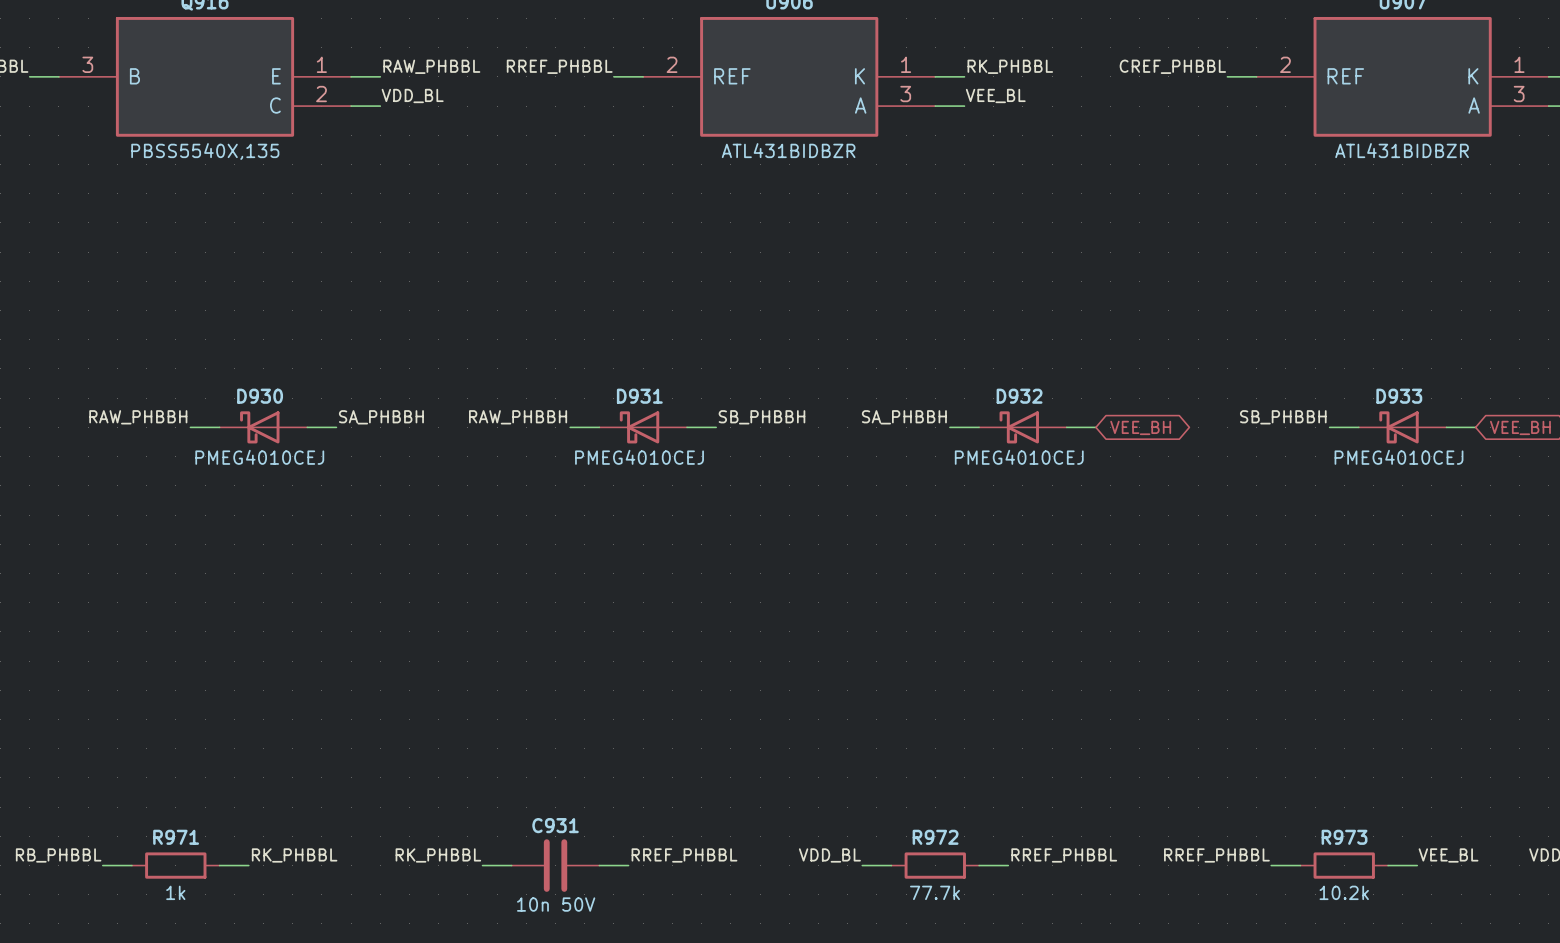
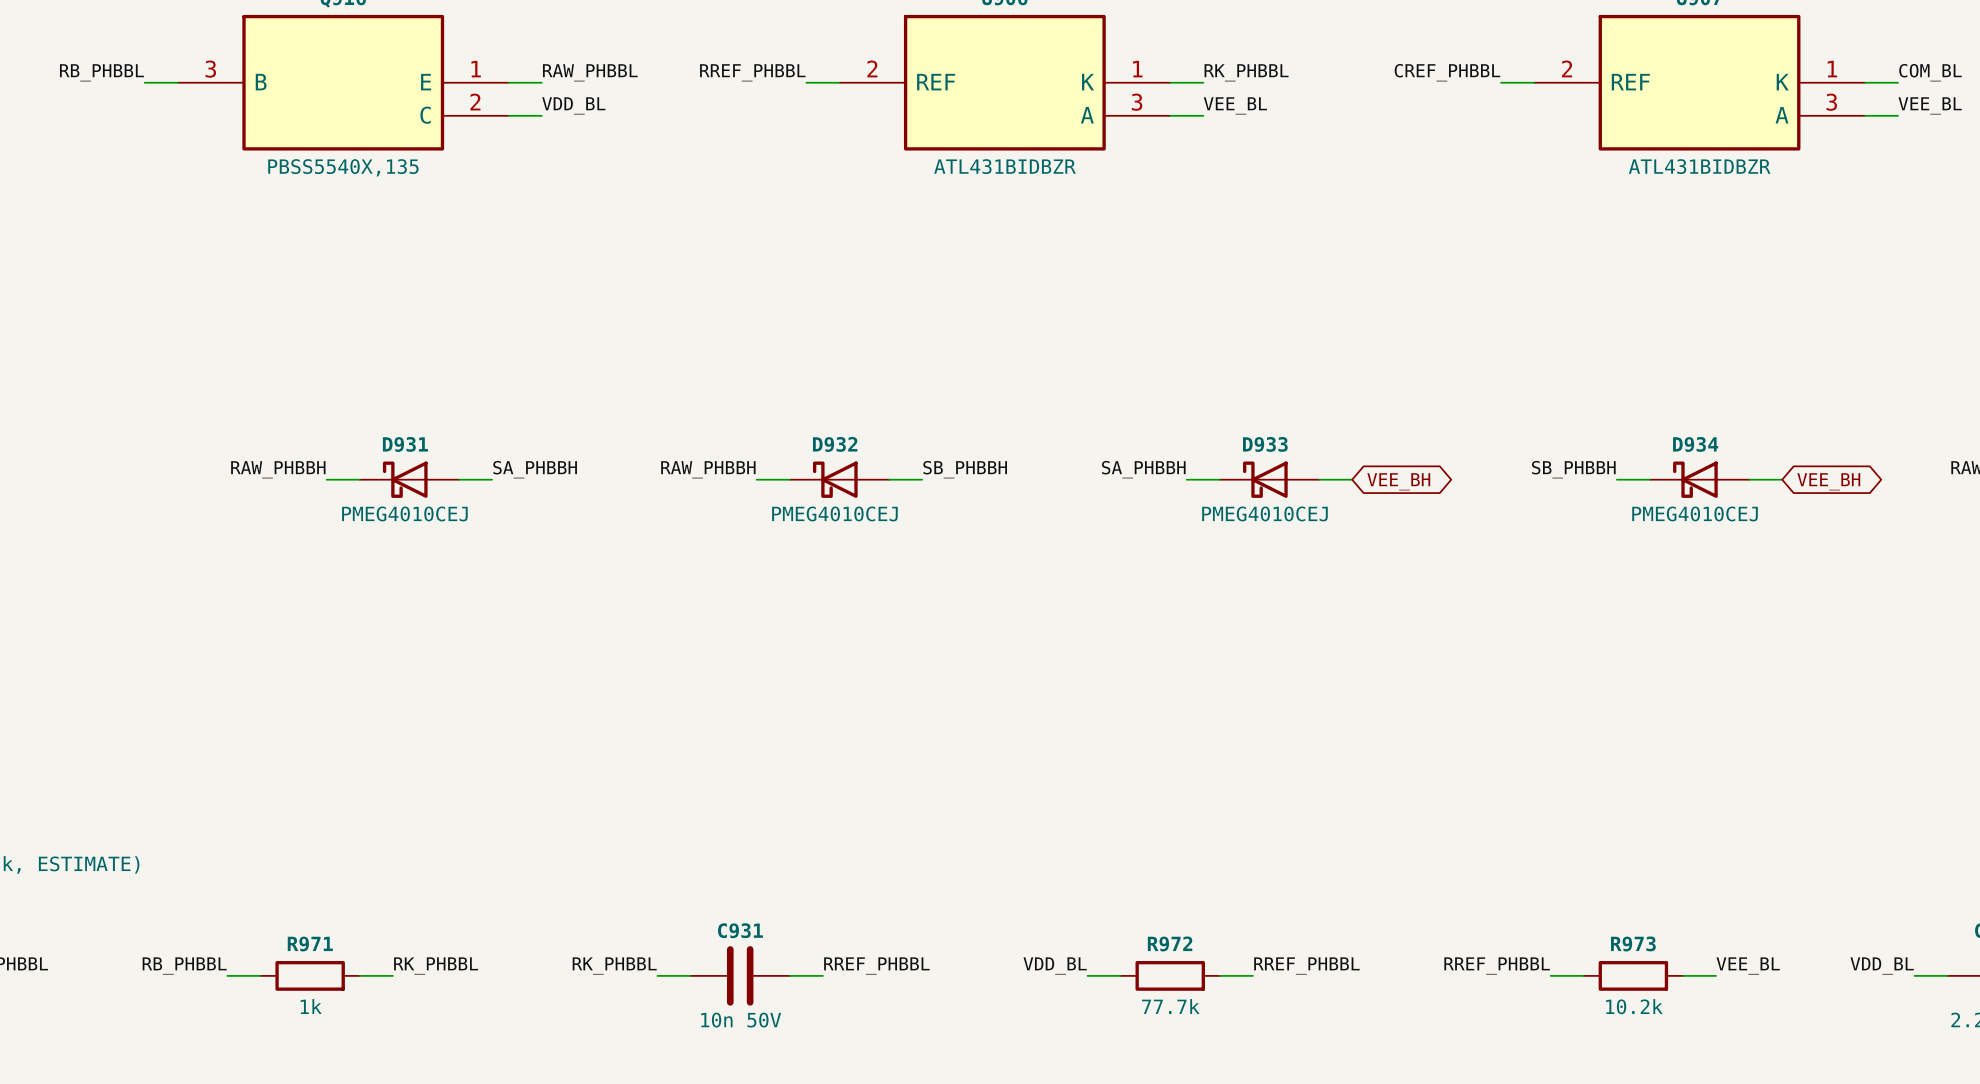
D930 name: D930 (260, 396) -> D931 (405, 444)
D931 name: D931 (639, 396) -> D932 (835, 444)
D932 name: D932 (1019, 396) -> D933 (1265, 444)
D933 name: D933 (1399, 396) -> D934 (1695, 444)

